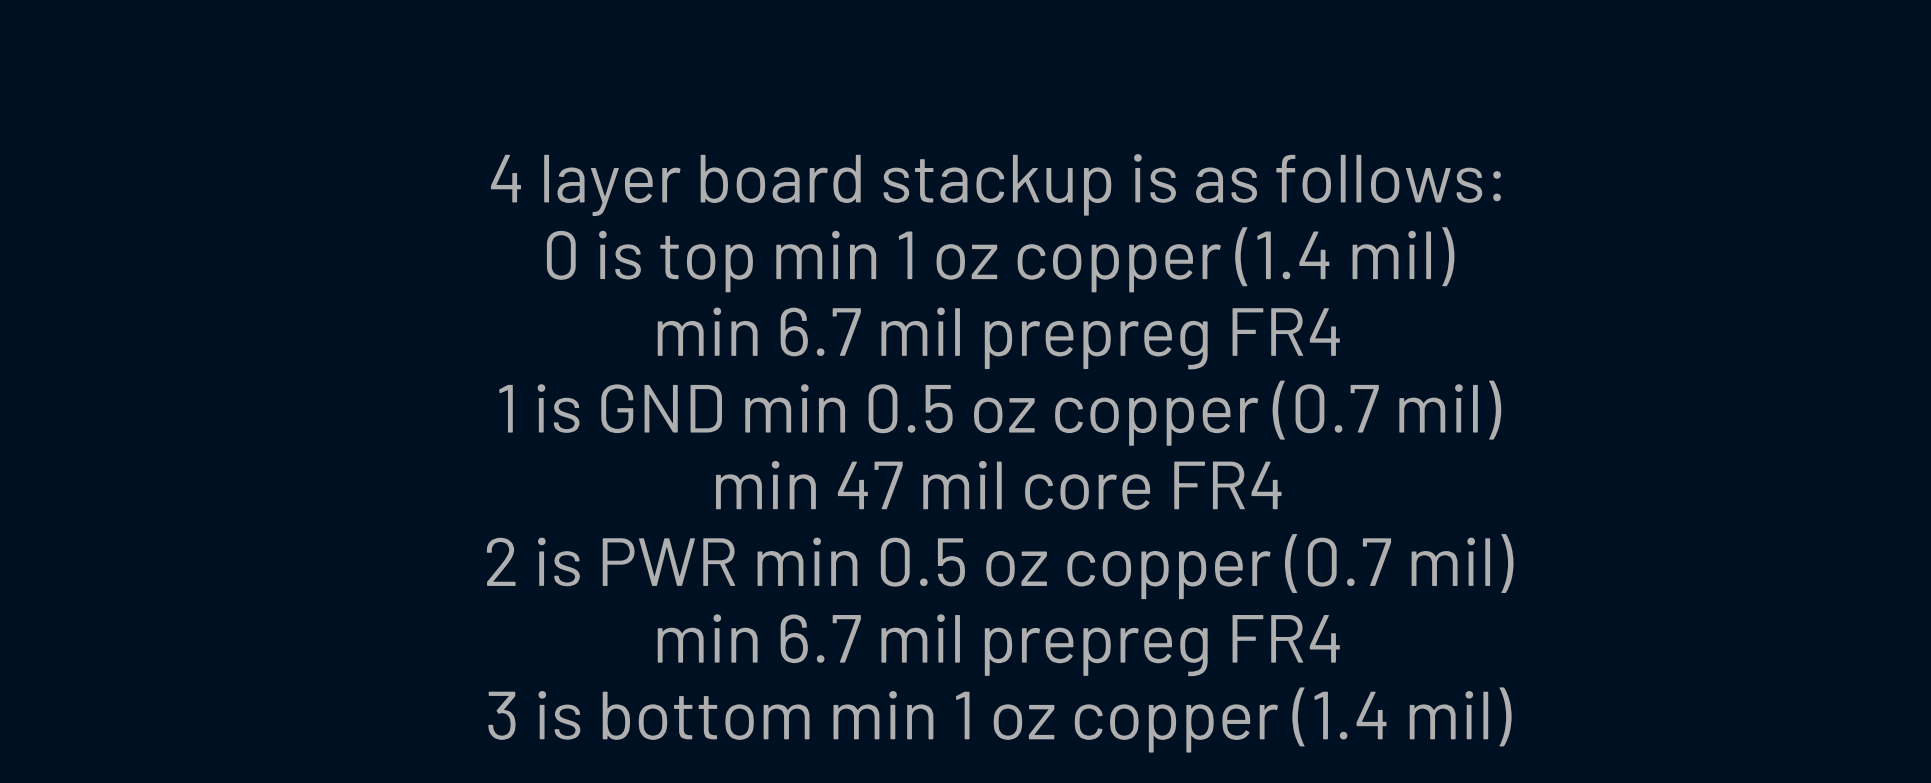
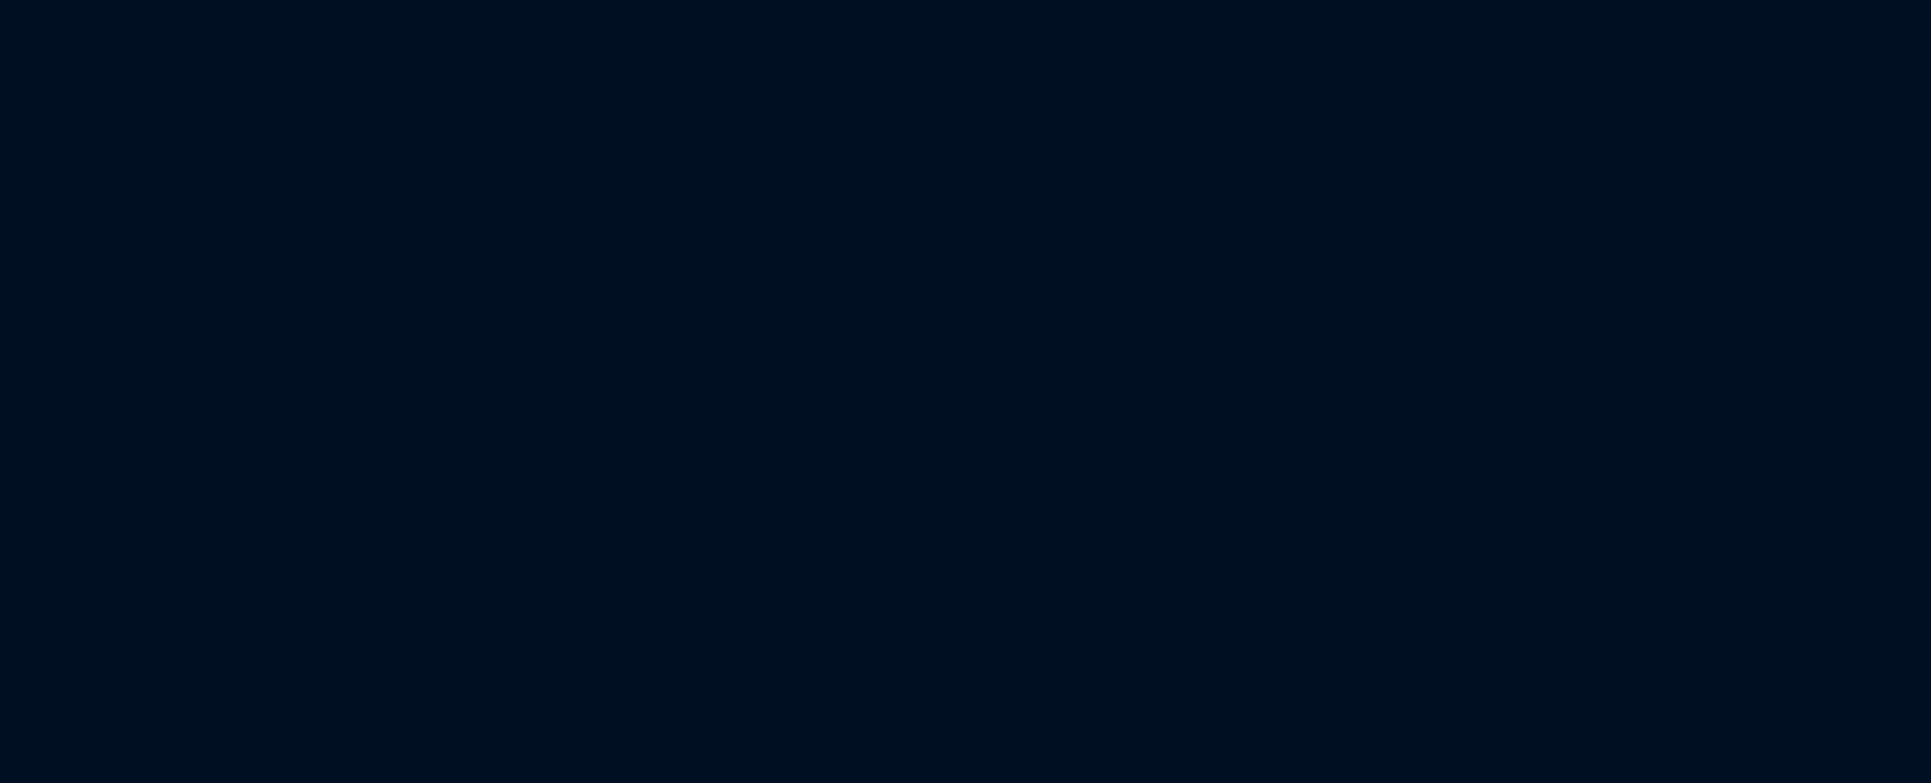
text: 4 layer board stackup is as follows: (995, 185) -> none
text: 0 is top min 1 oz copper (1.4 mil) (1000, 259) -> none
text: min 6.7 mil prepreg FR4 (998, 338) -> none
text: 1 is GND min 0.5 oz copper (0.7 mil) (1000, 413) -> none
text: min 47 mil core FR4 (998, 485) -> none
text: 2 is PWR min 0.5 oz copper (0.7 mil) (1000, 566) -> none
text: min 6.7 mil prepreg FR4 (998, 645) -> none
text: 3 is bottom min 1 oz copper (1.4 mil) (999, 719) -> none

